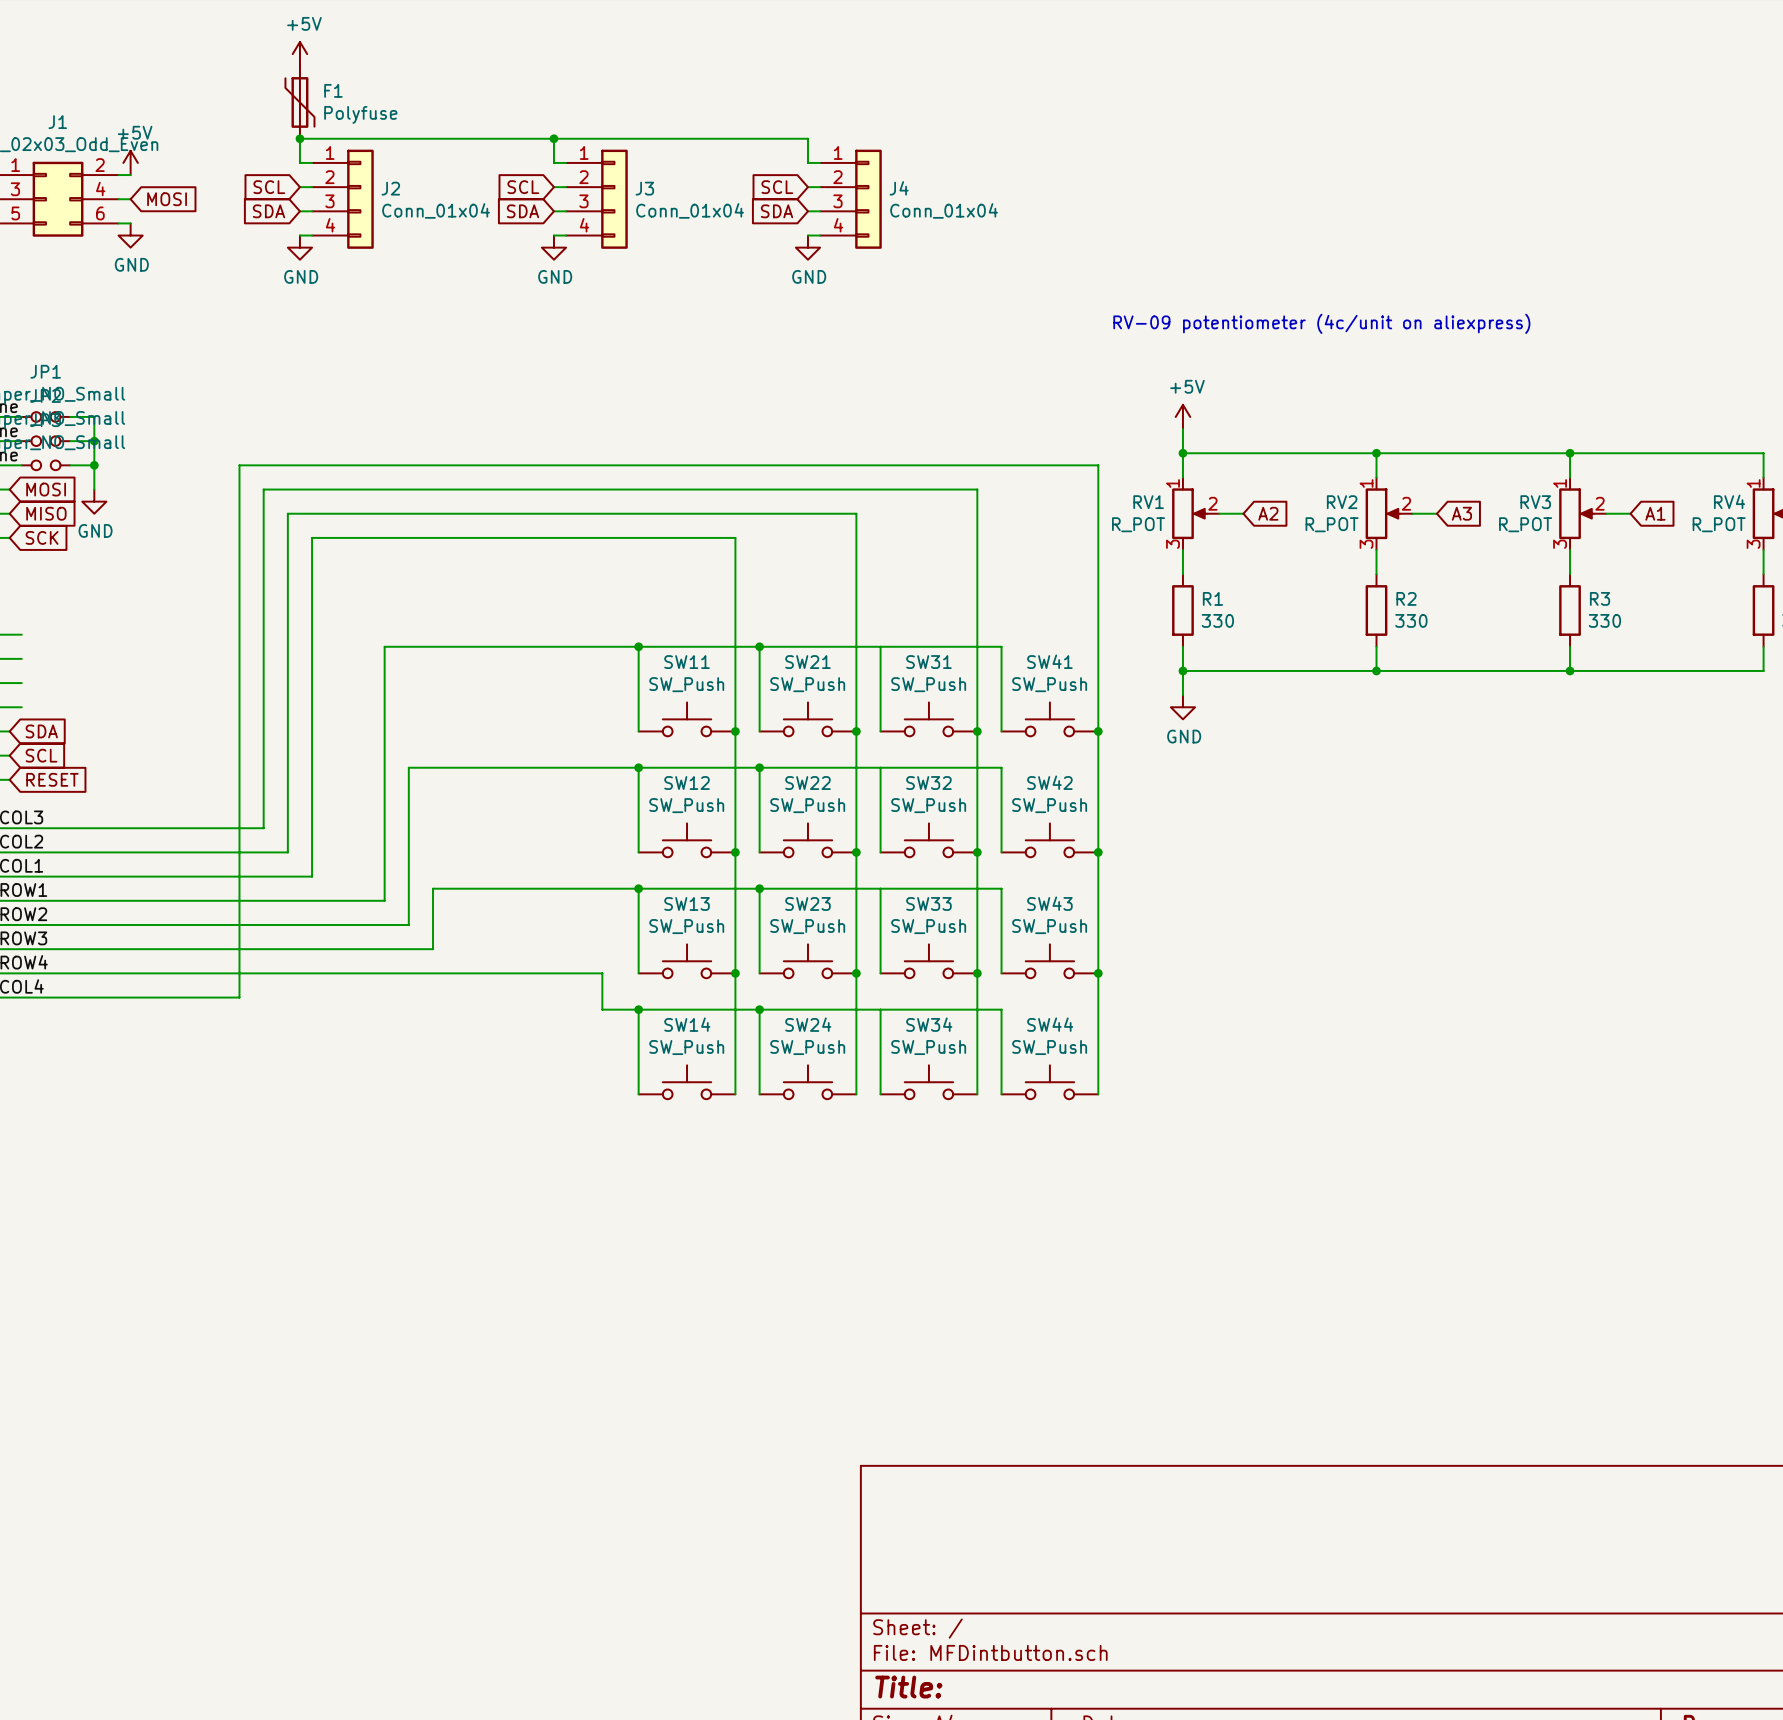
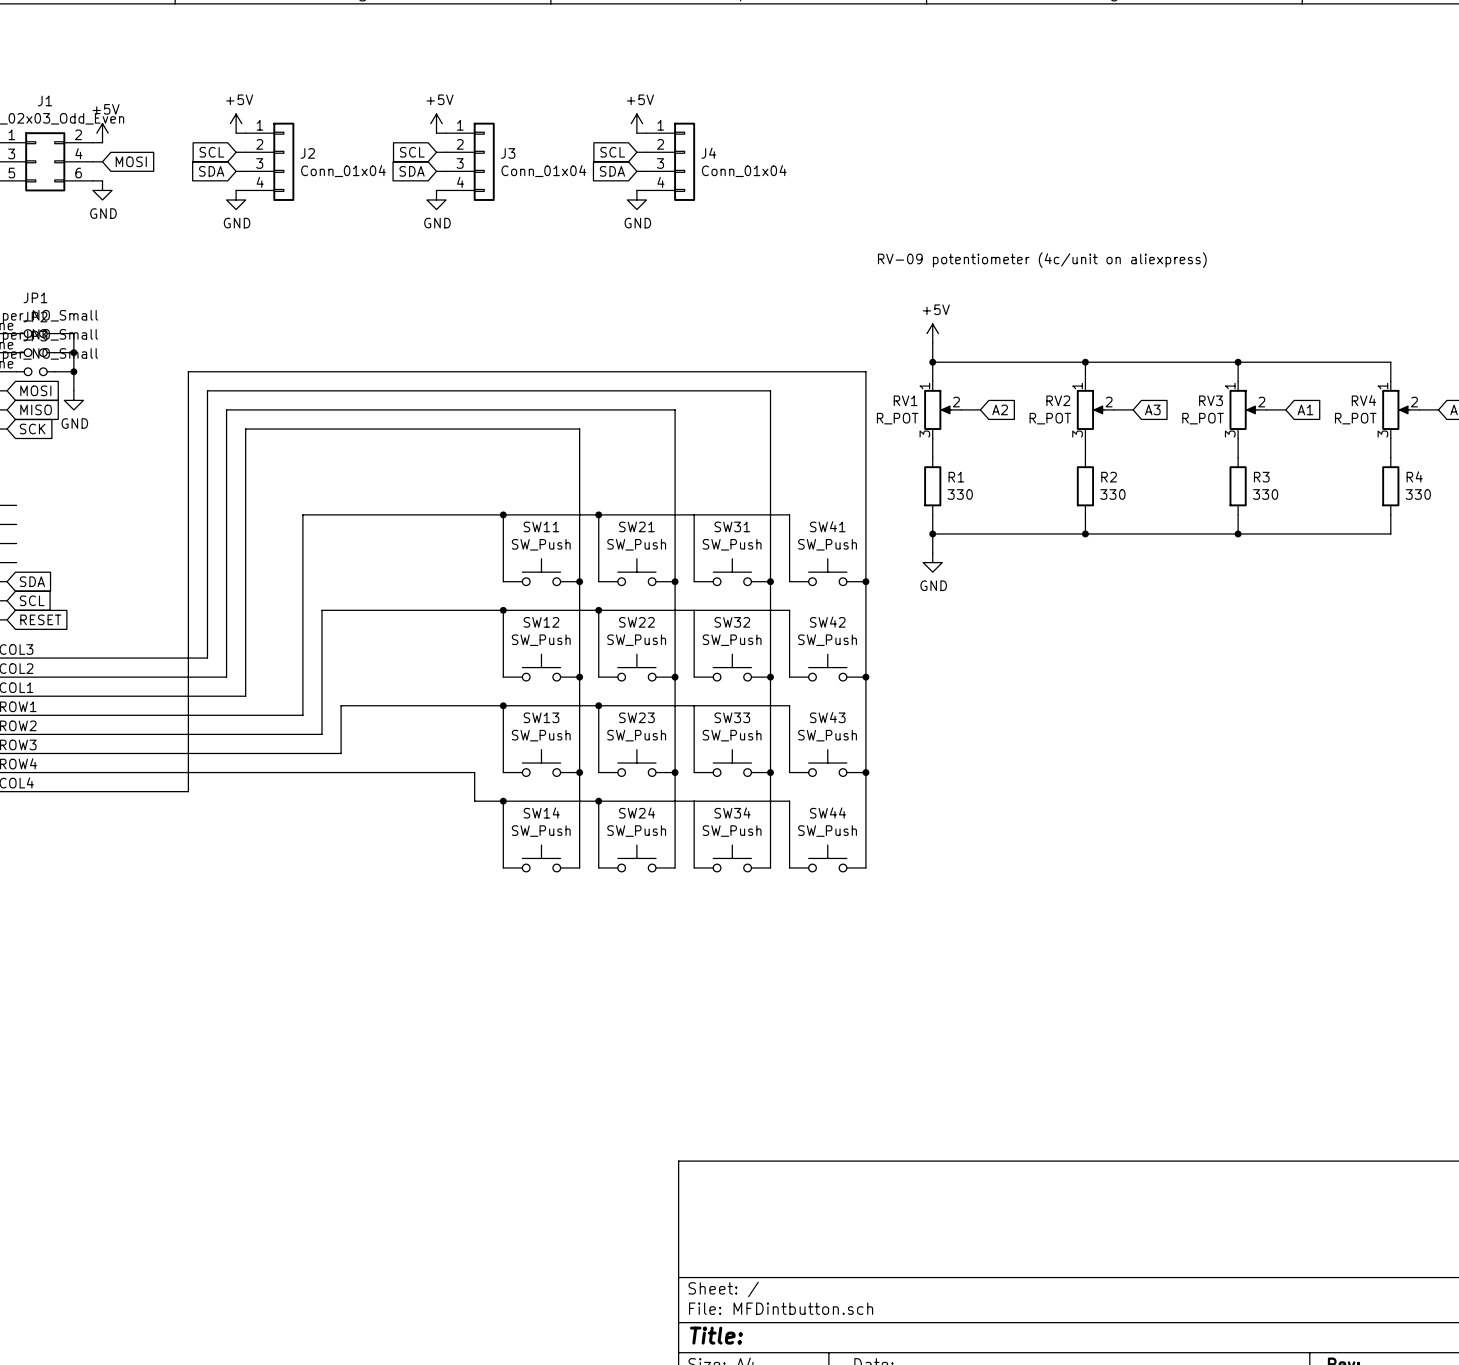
power symbol position: +5V (299, 54) -> +5V (236, 123)
F1: Polyfuse (299, 102) -> none
junction: (299, 138) -> none
junction: (553, 138) -> none
power symbol: none -> +5V (436, 123)
power symbol: none -> +5V (636, 123)
wire: (299, 162) (299, 138) (807, 138) (807, 162) -> none

